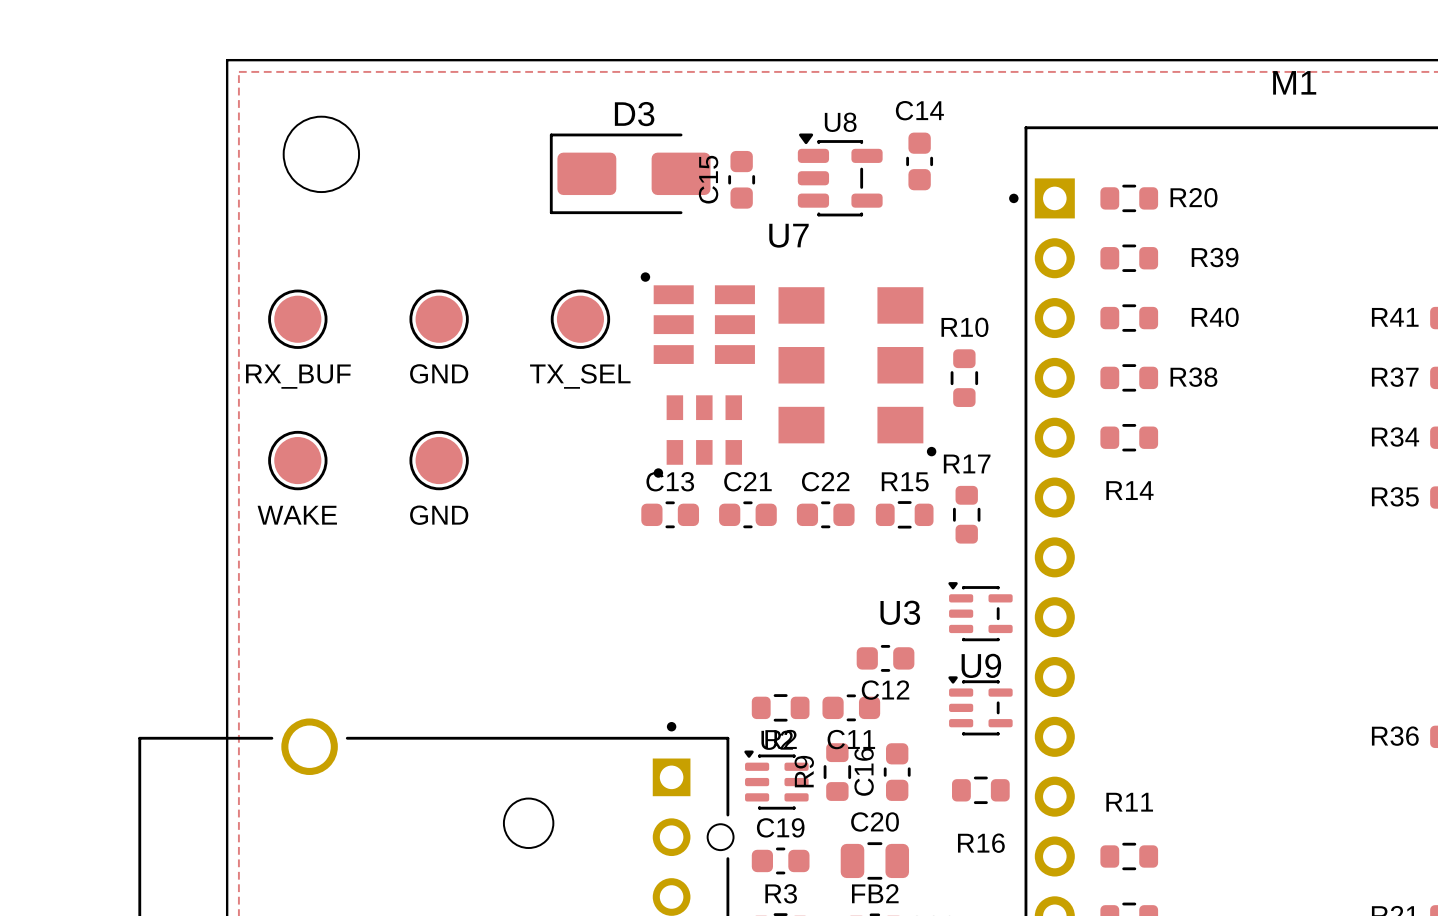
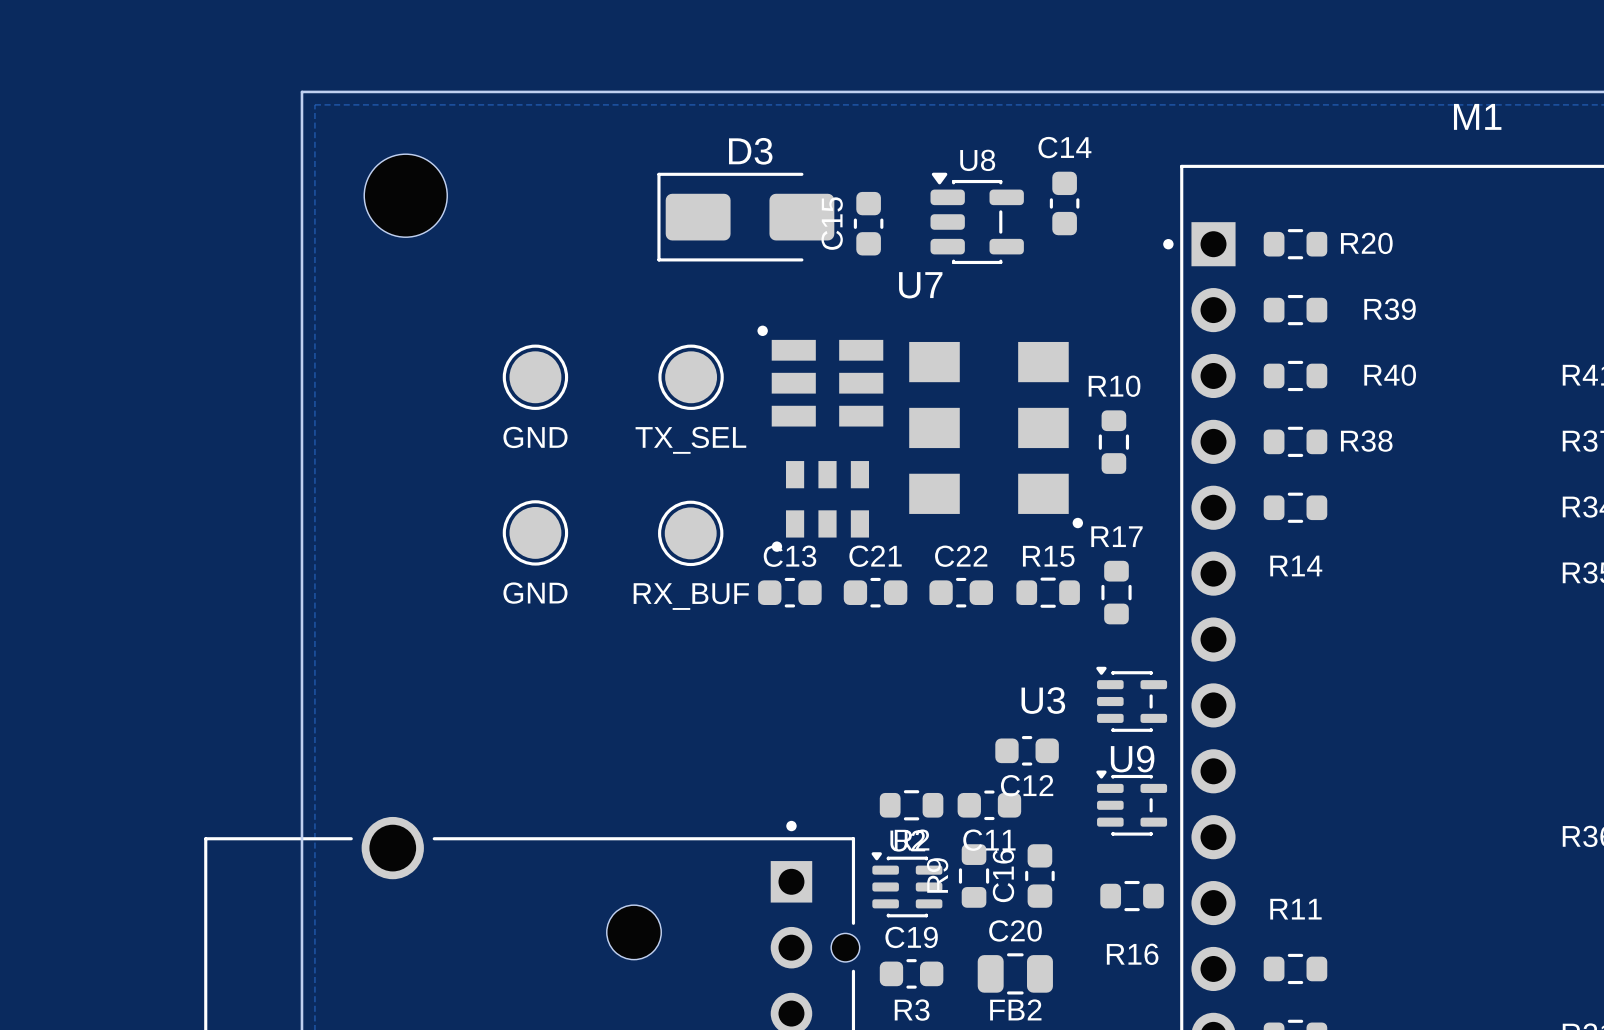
part position: (297, 319) -> (690, 533)
part: WAKE (297, 460) -> none

